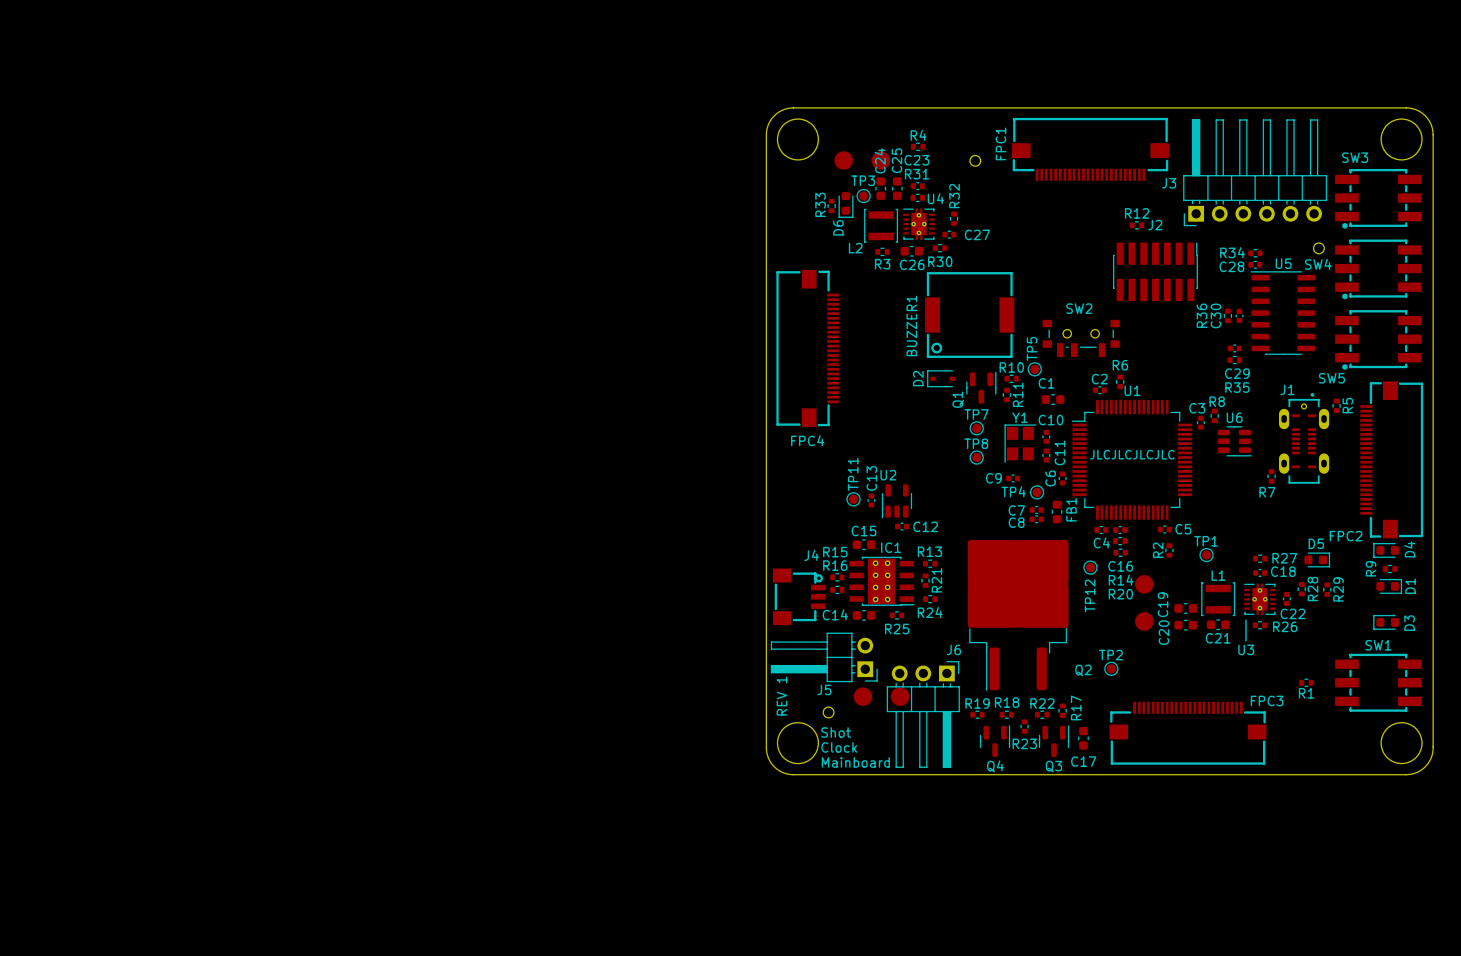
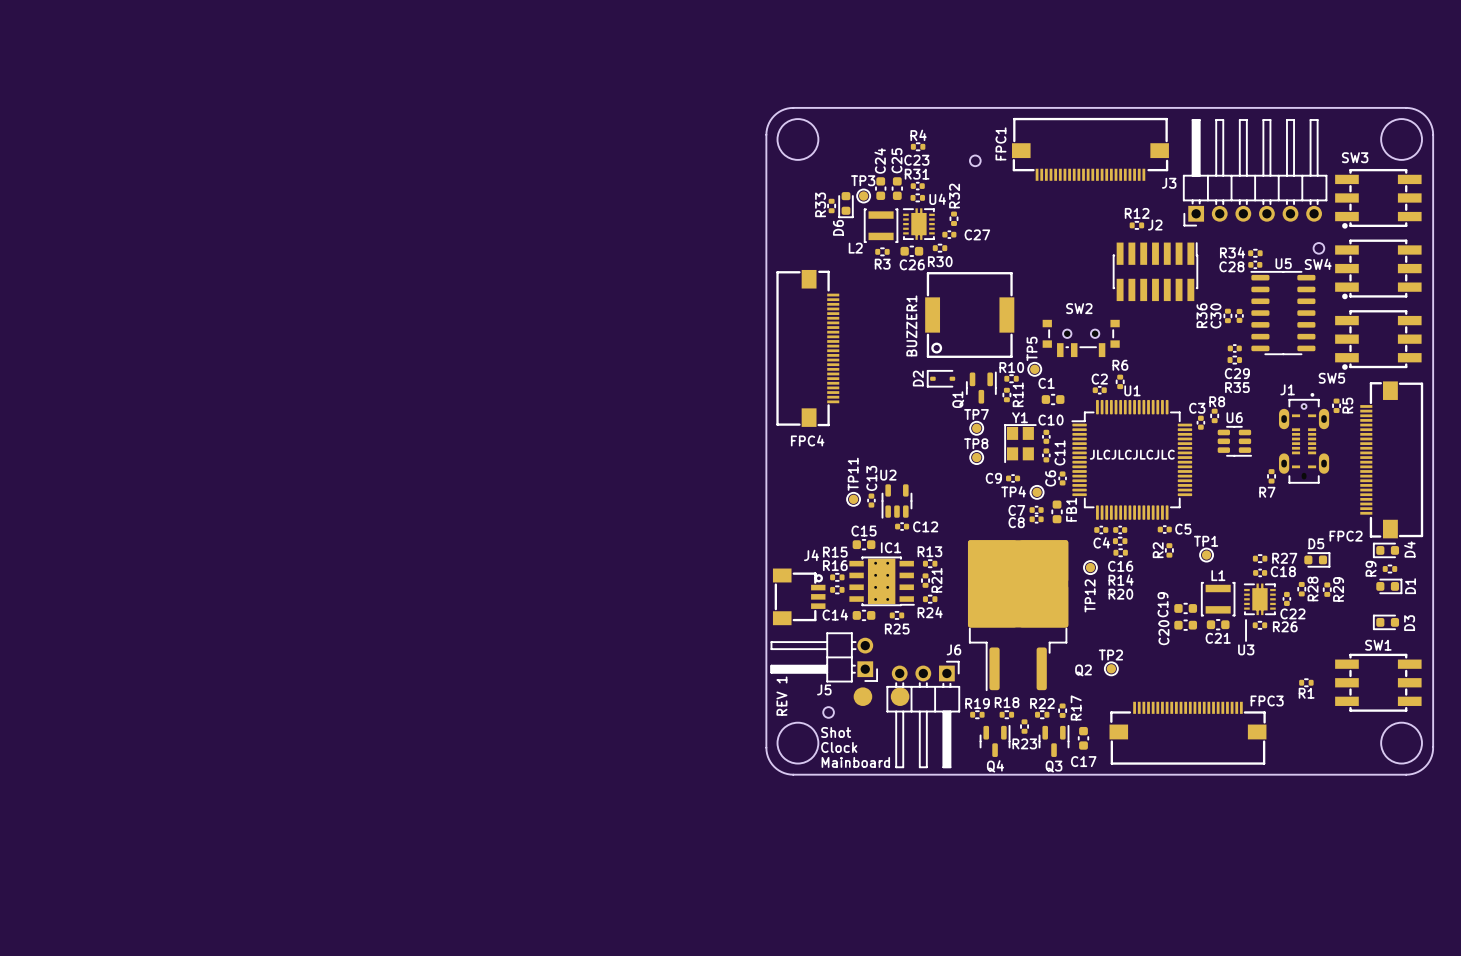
part: (862, 160) -> none
U4 footprint: [903, 208, 935, 240] -> [903, 208, 935, 240]
U3 footprint: [1244, 583, 1276, 616] -> [1244, 583, 1276, 616]
part: (1144, 602) -> none

